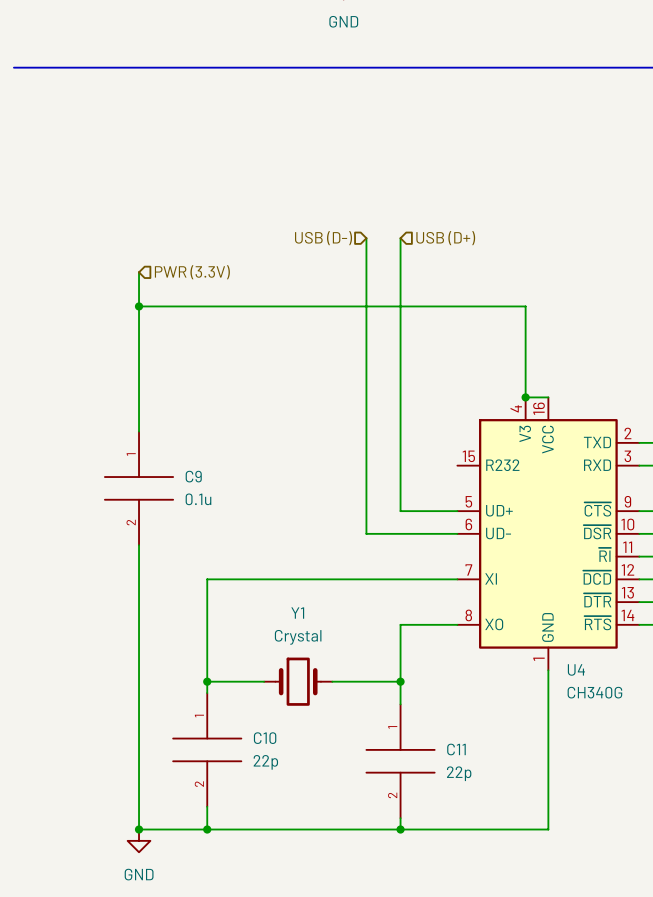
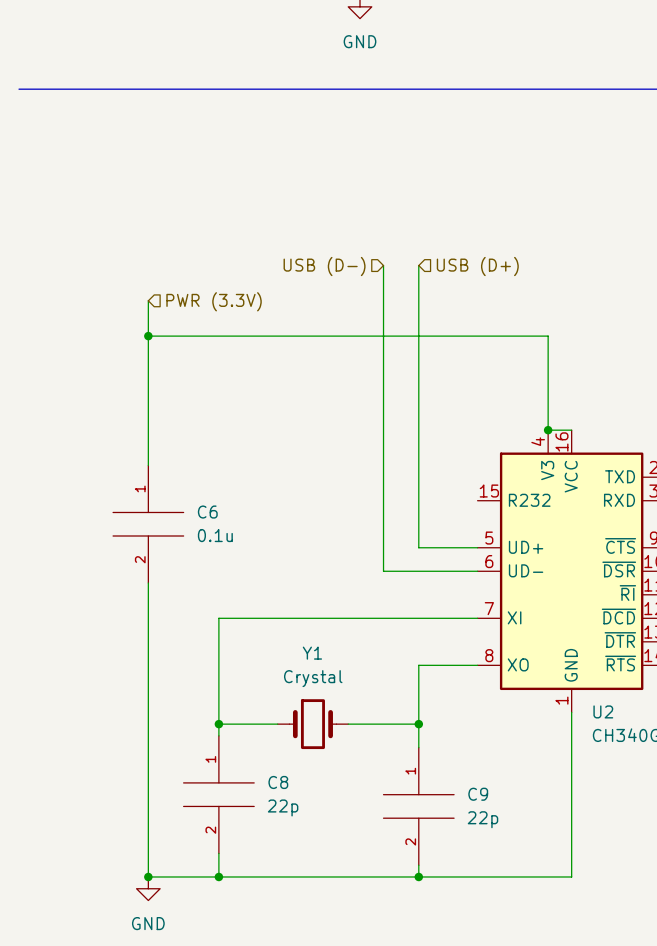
C9 name: C9 (193, 476) -> C6 (207, 512)
U4 name: U4 (576, 669) -> U2 (603, 711)
C10 name: C10 (265, 738) -> C8 (278, 782)
C11 name: C11 (456, 749) -> C9 (478, 794)

